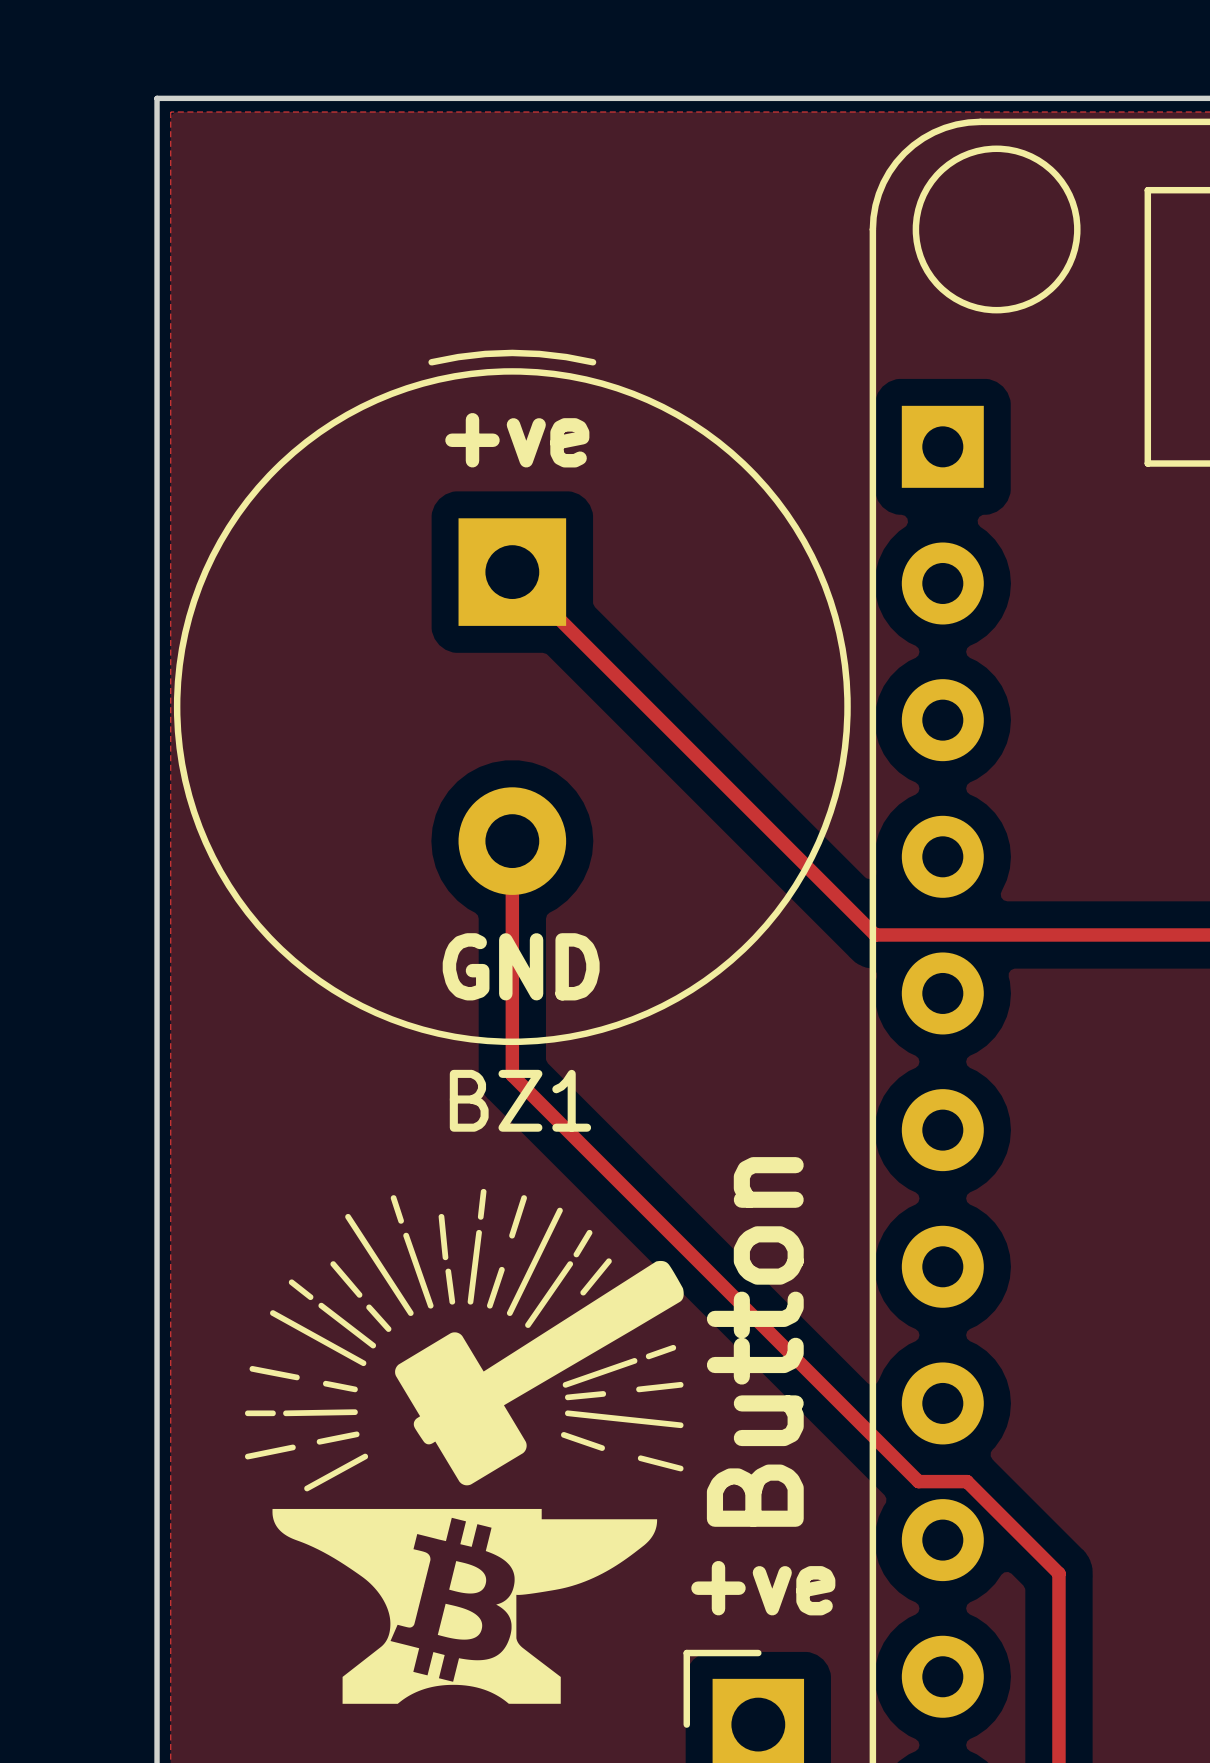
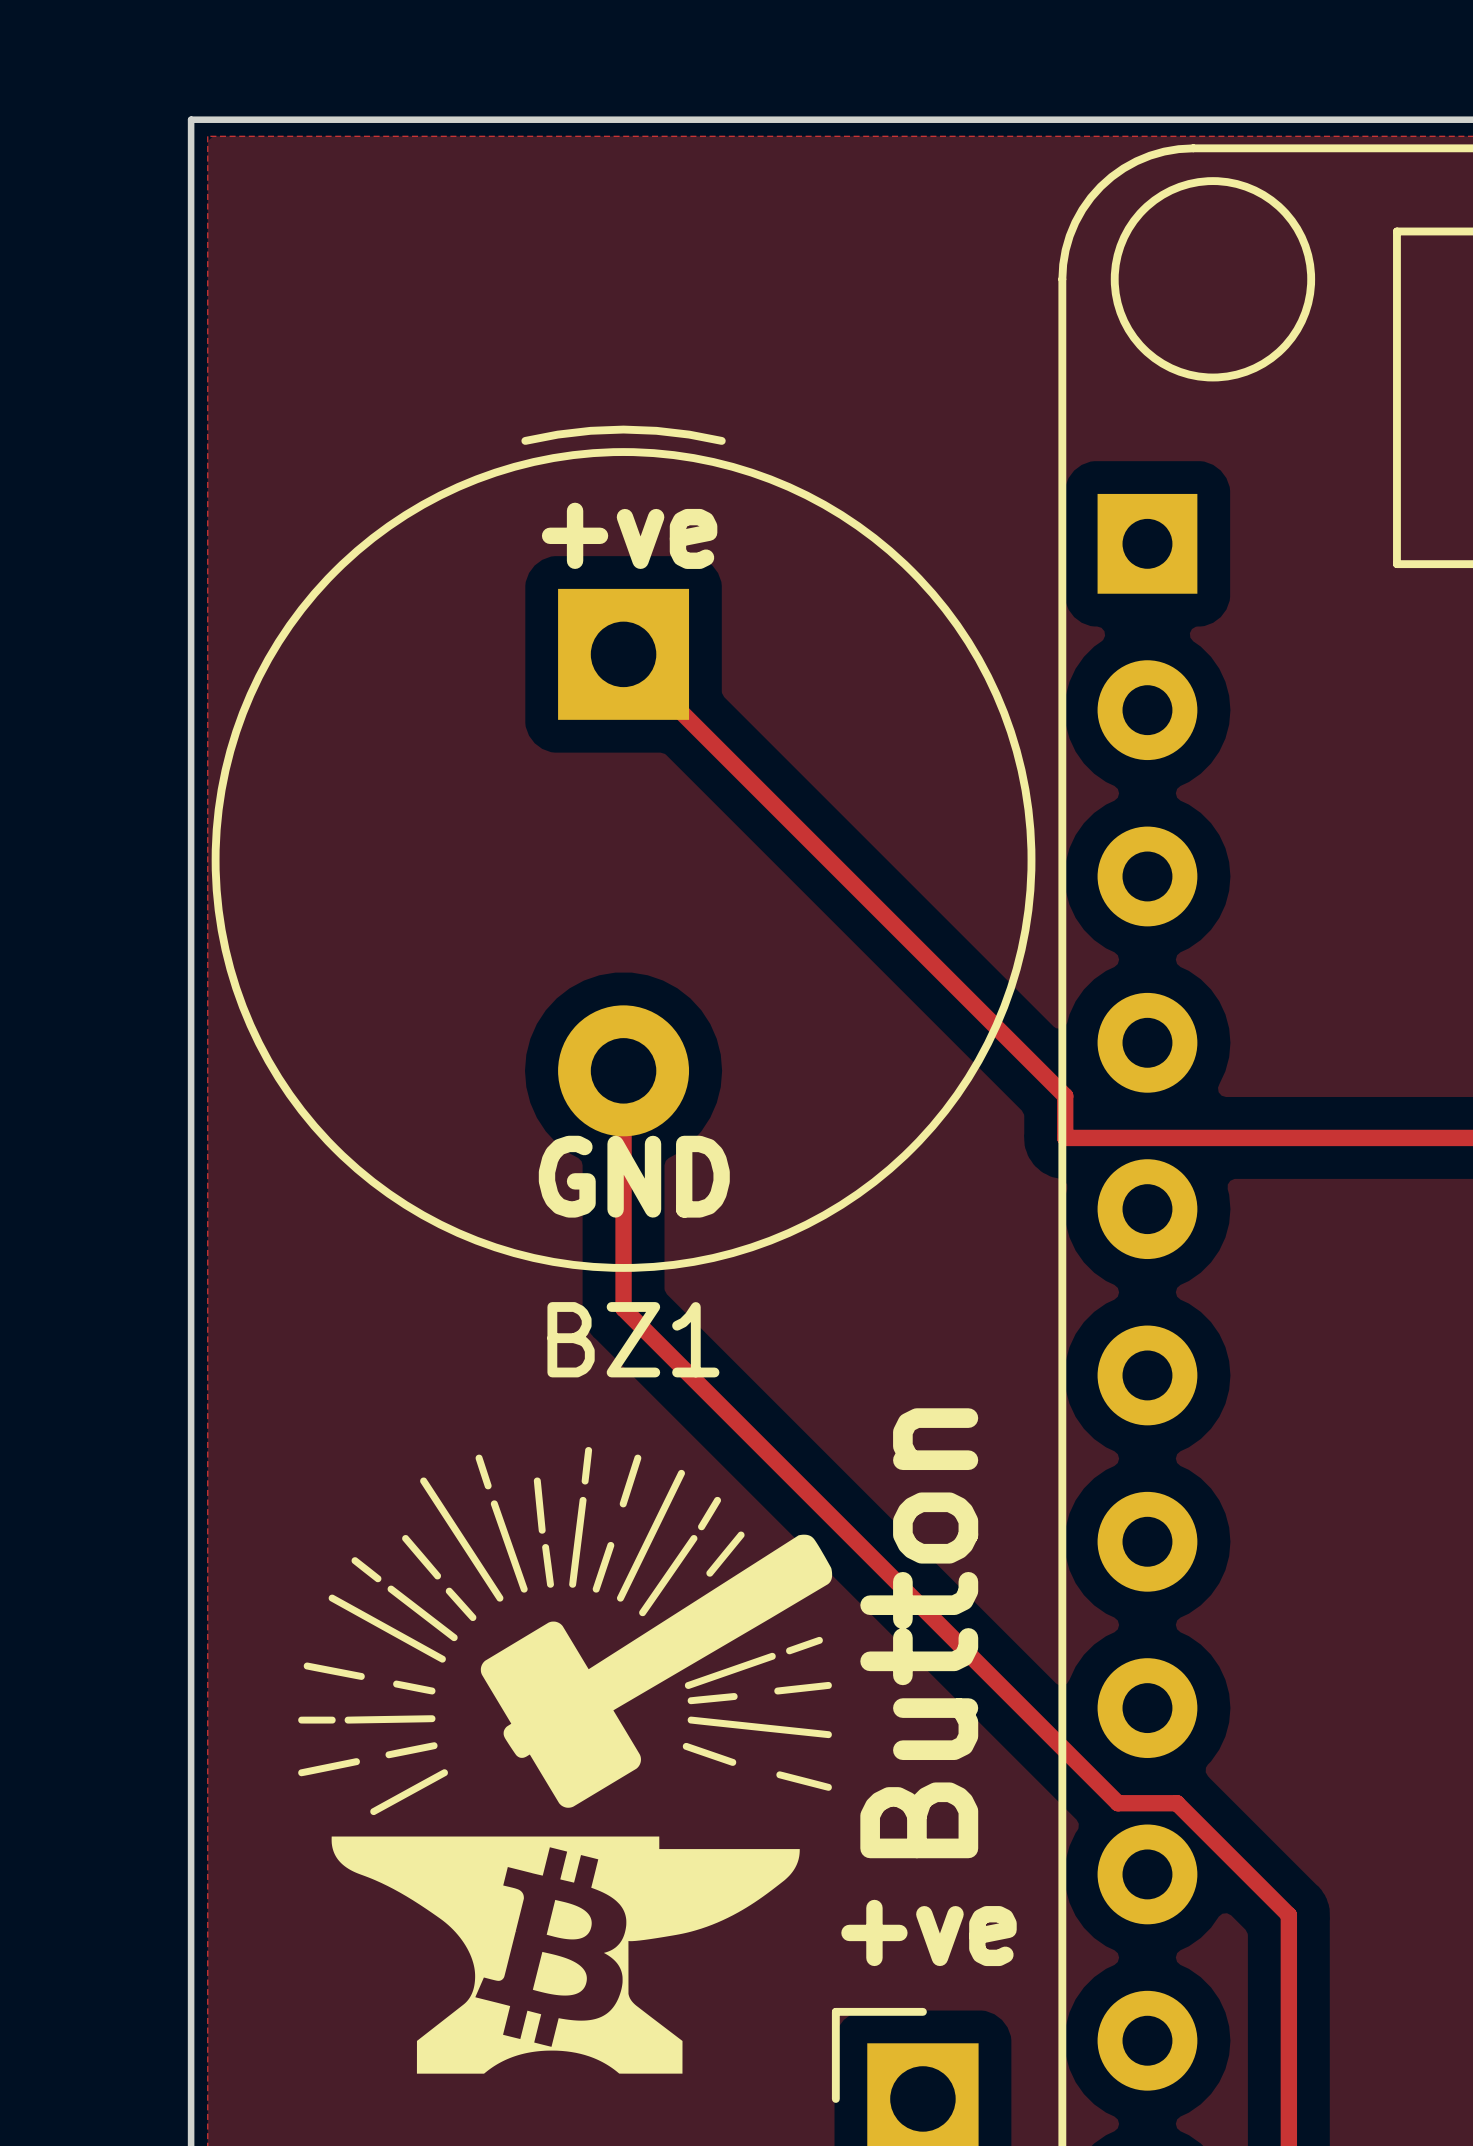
BZ1 footprint: [173, 349, 851, 1046] -> [211, 425, 1036, 1272]
track: (512, 572) (875, 934) -> (623, 654) (1065, 1096) (1065, 1137)

